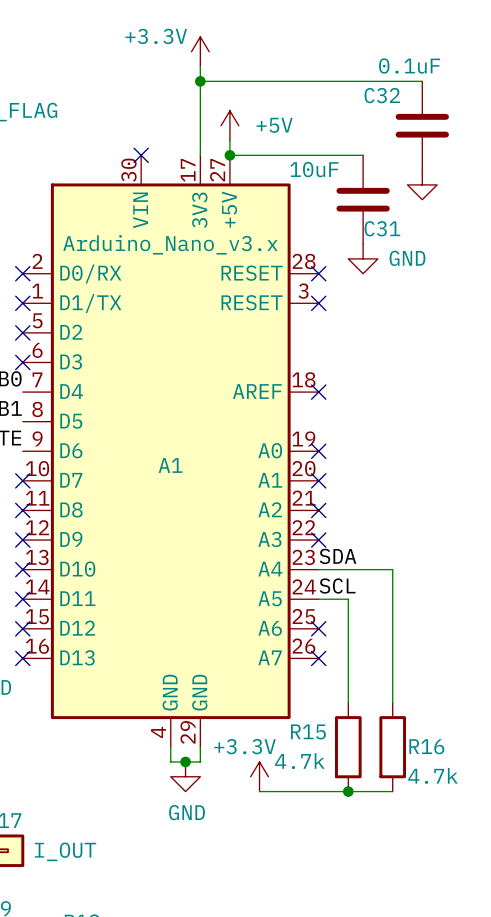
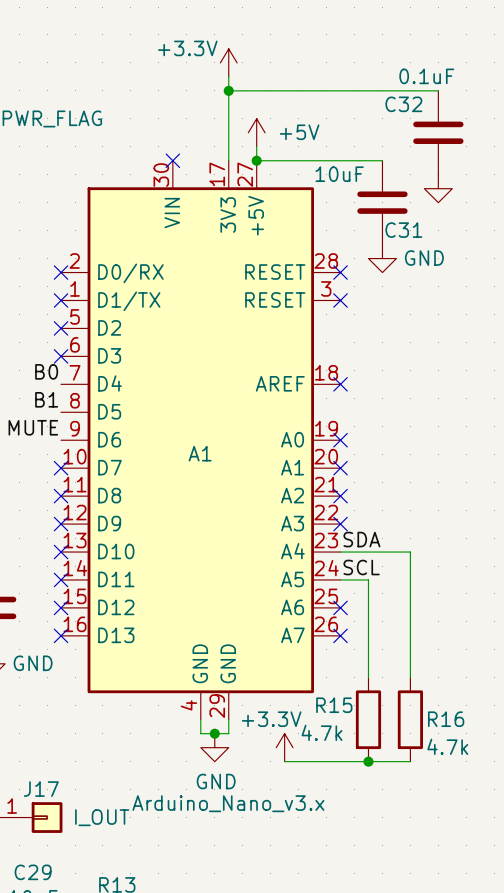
A1 value position: Arduino_Nano_v3.x (170, 244) -> Arduino_Nano_v3.x (228, 803)

